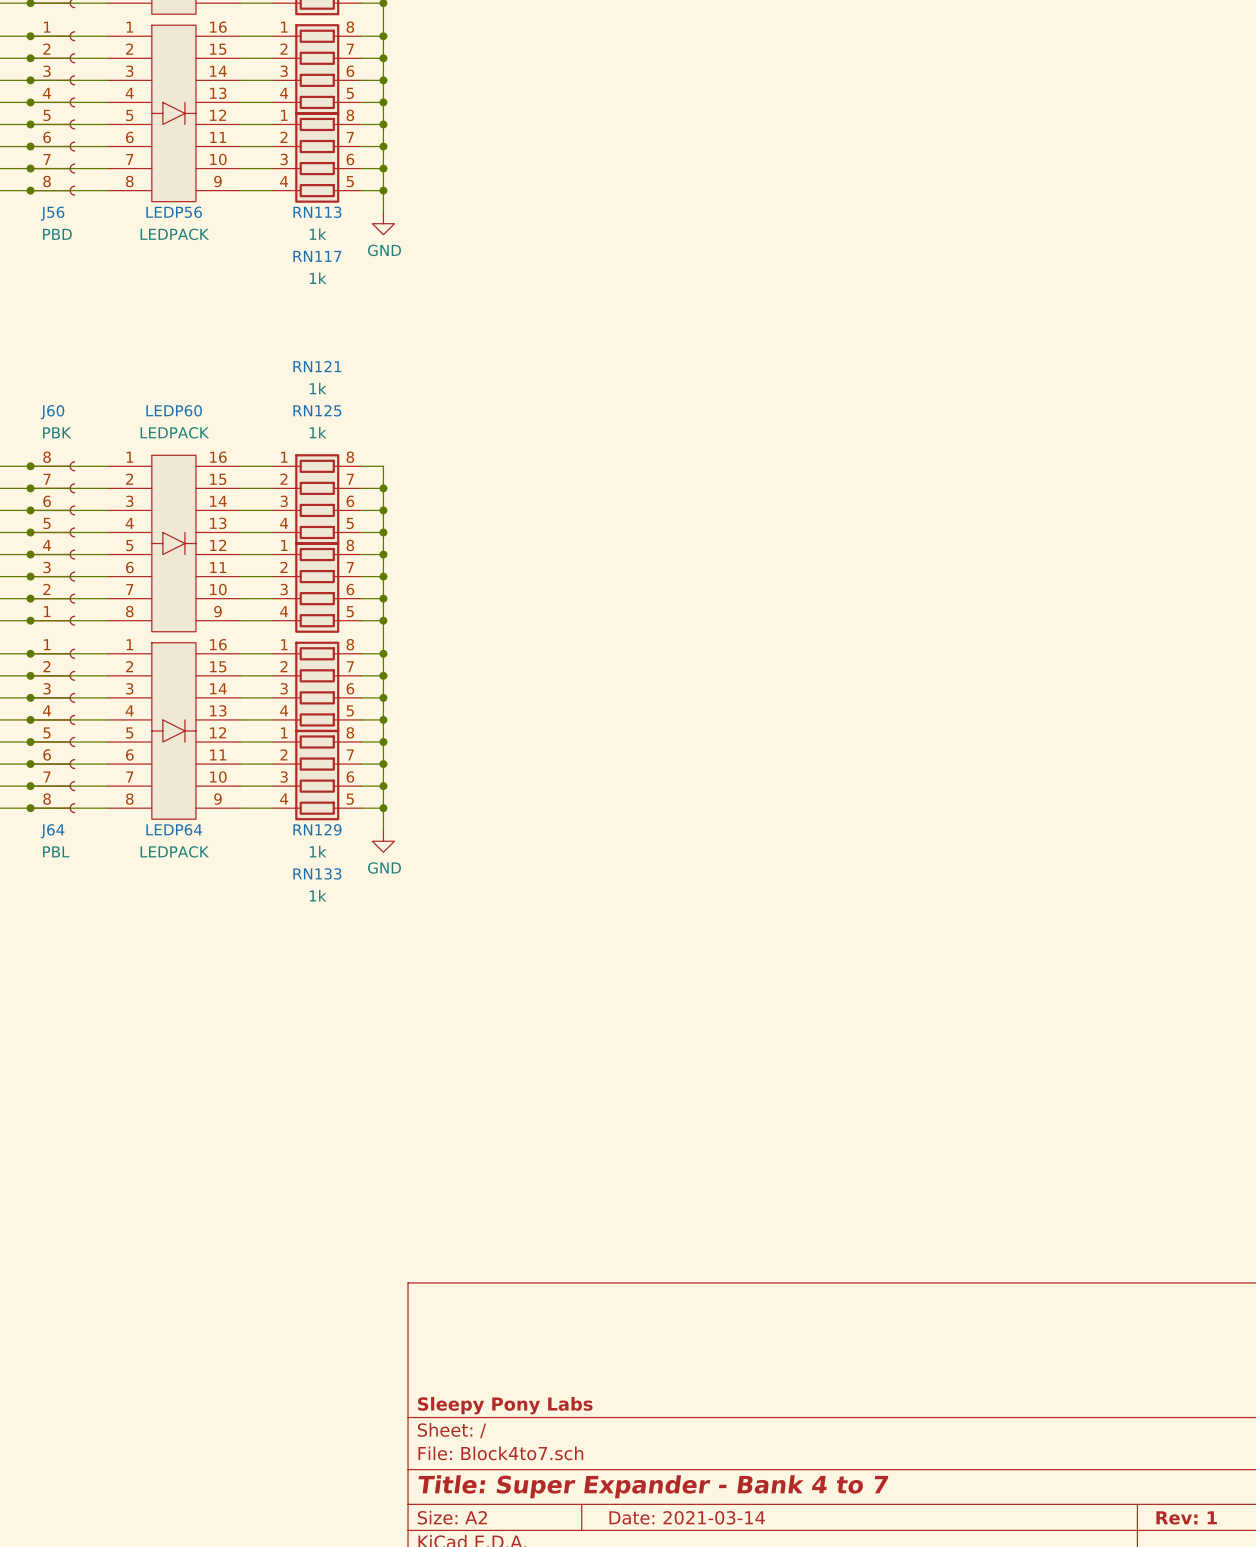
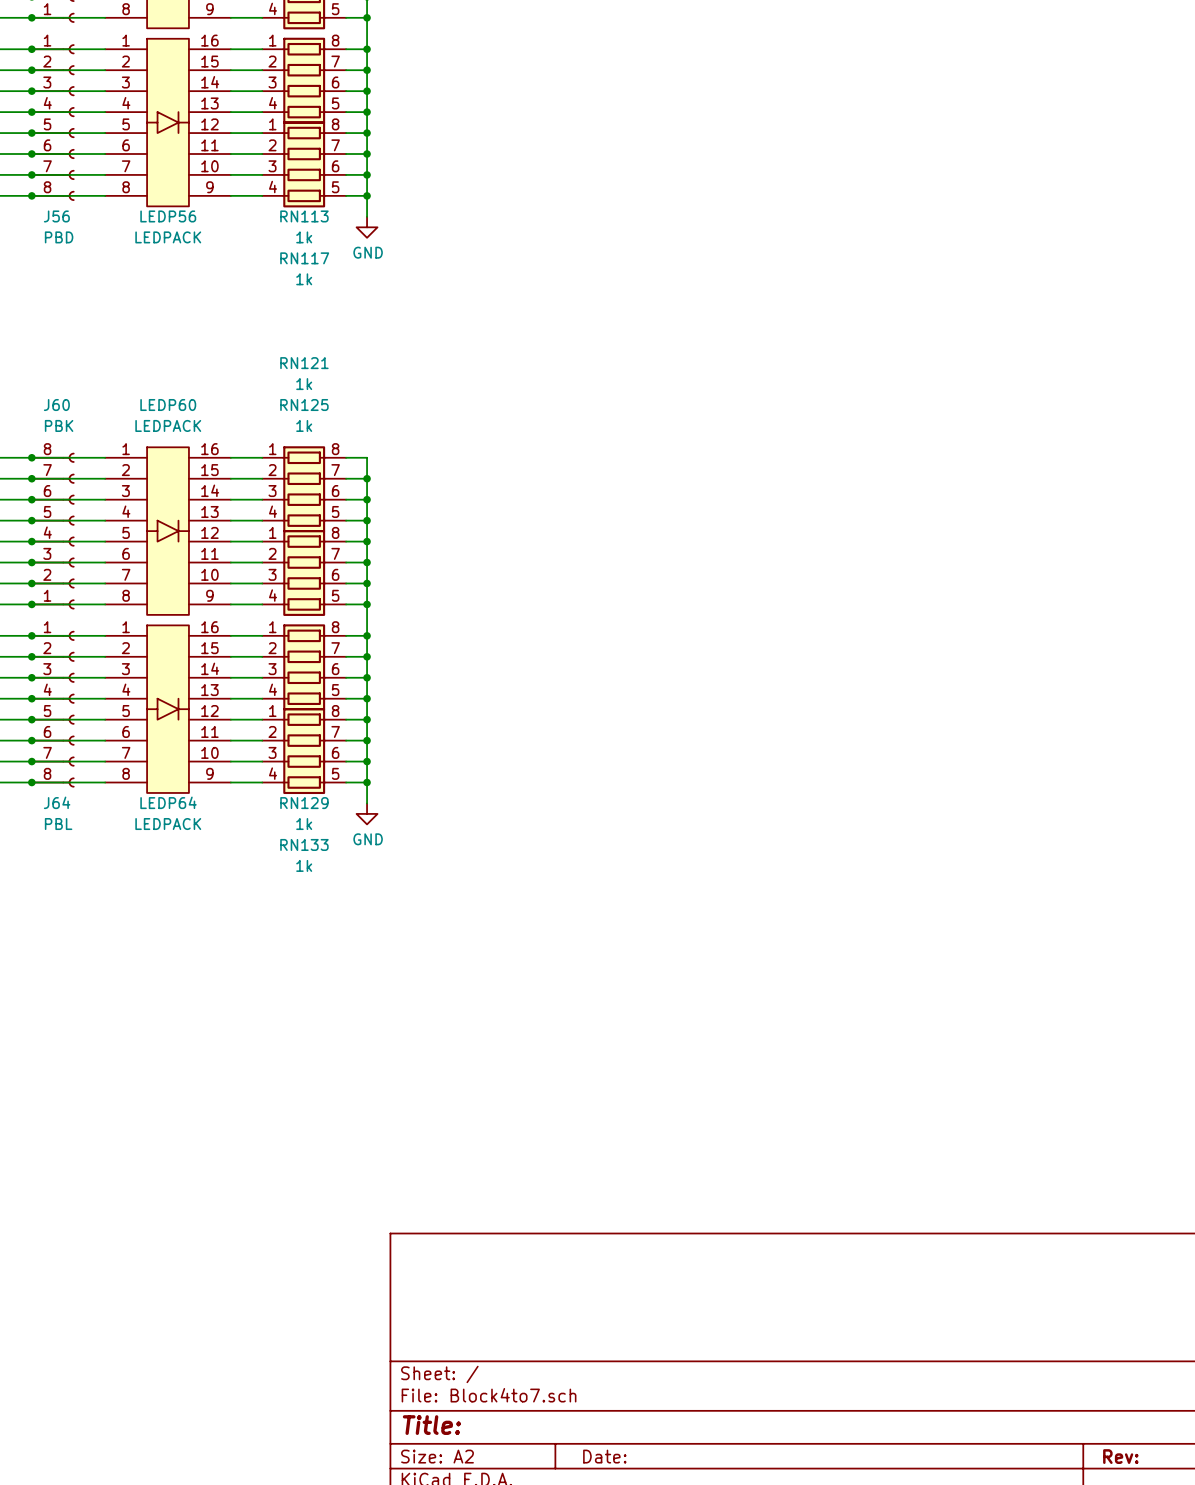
title block: Sleepy Pony Labs (505, 1405) -> none
title block: Title: Super Expander - Bank 4 to 7 (653, 1486) -> Title: (431, 1425)
title block: Date: 2021-03-14 (687, 1517) -> Date: (604, 1456)
title block: Rev: 1 (1186, 1517) -> Rev: (1120, 1456)

